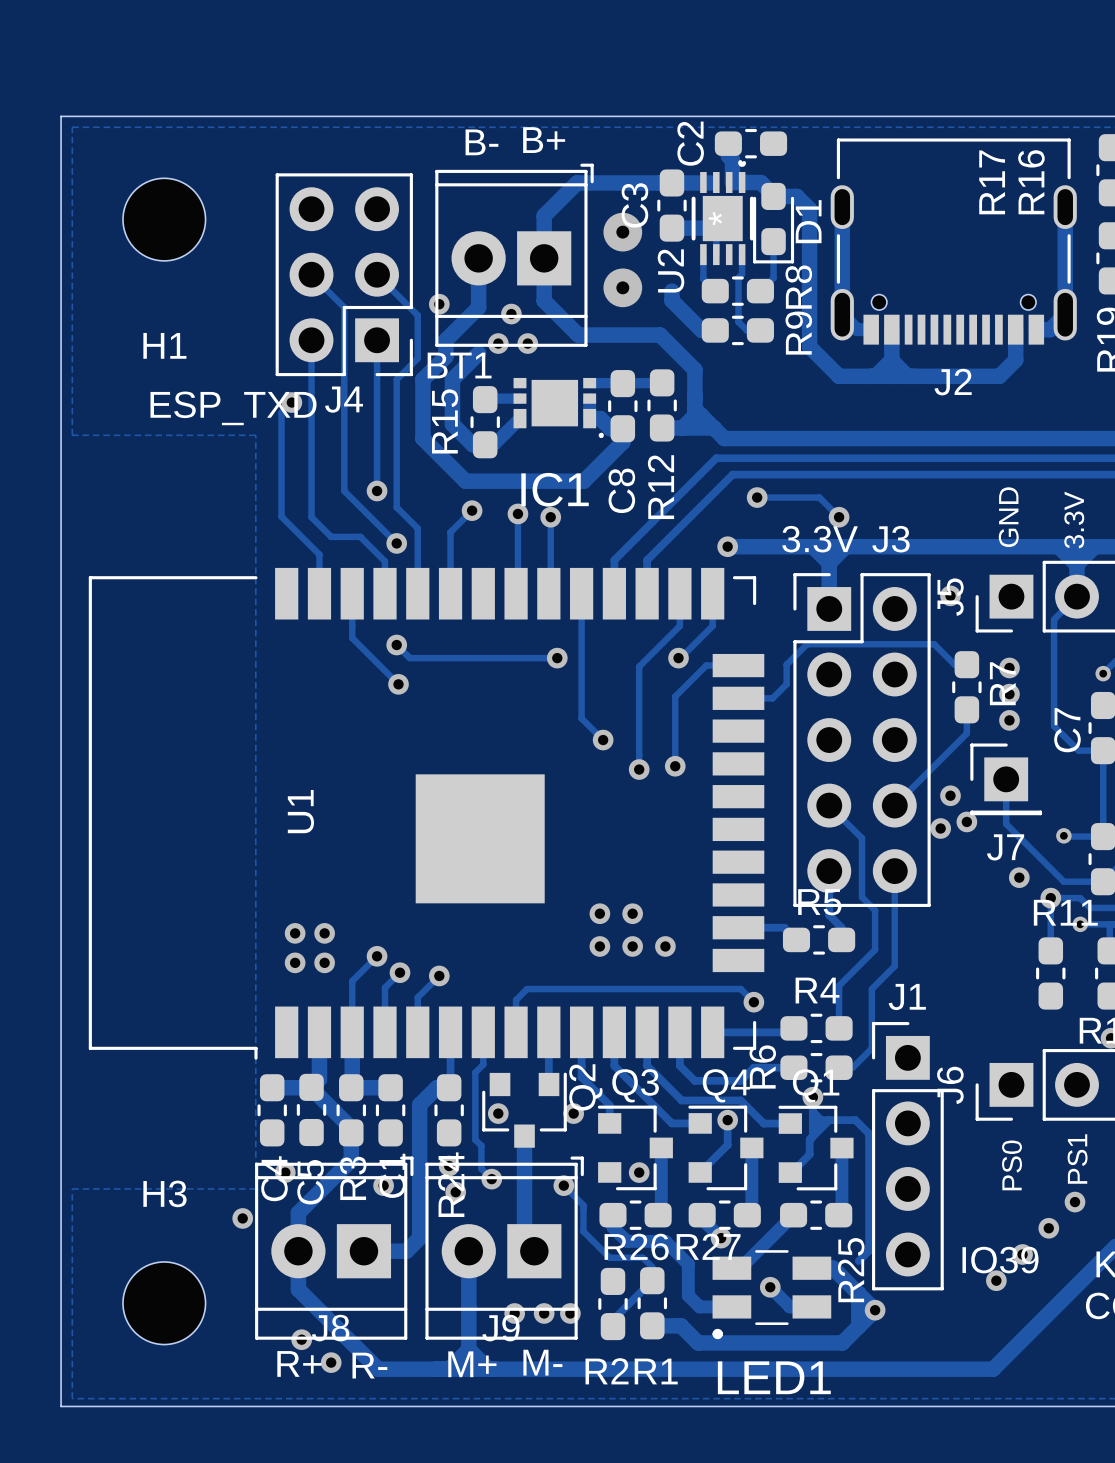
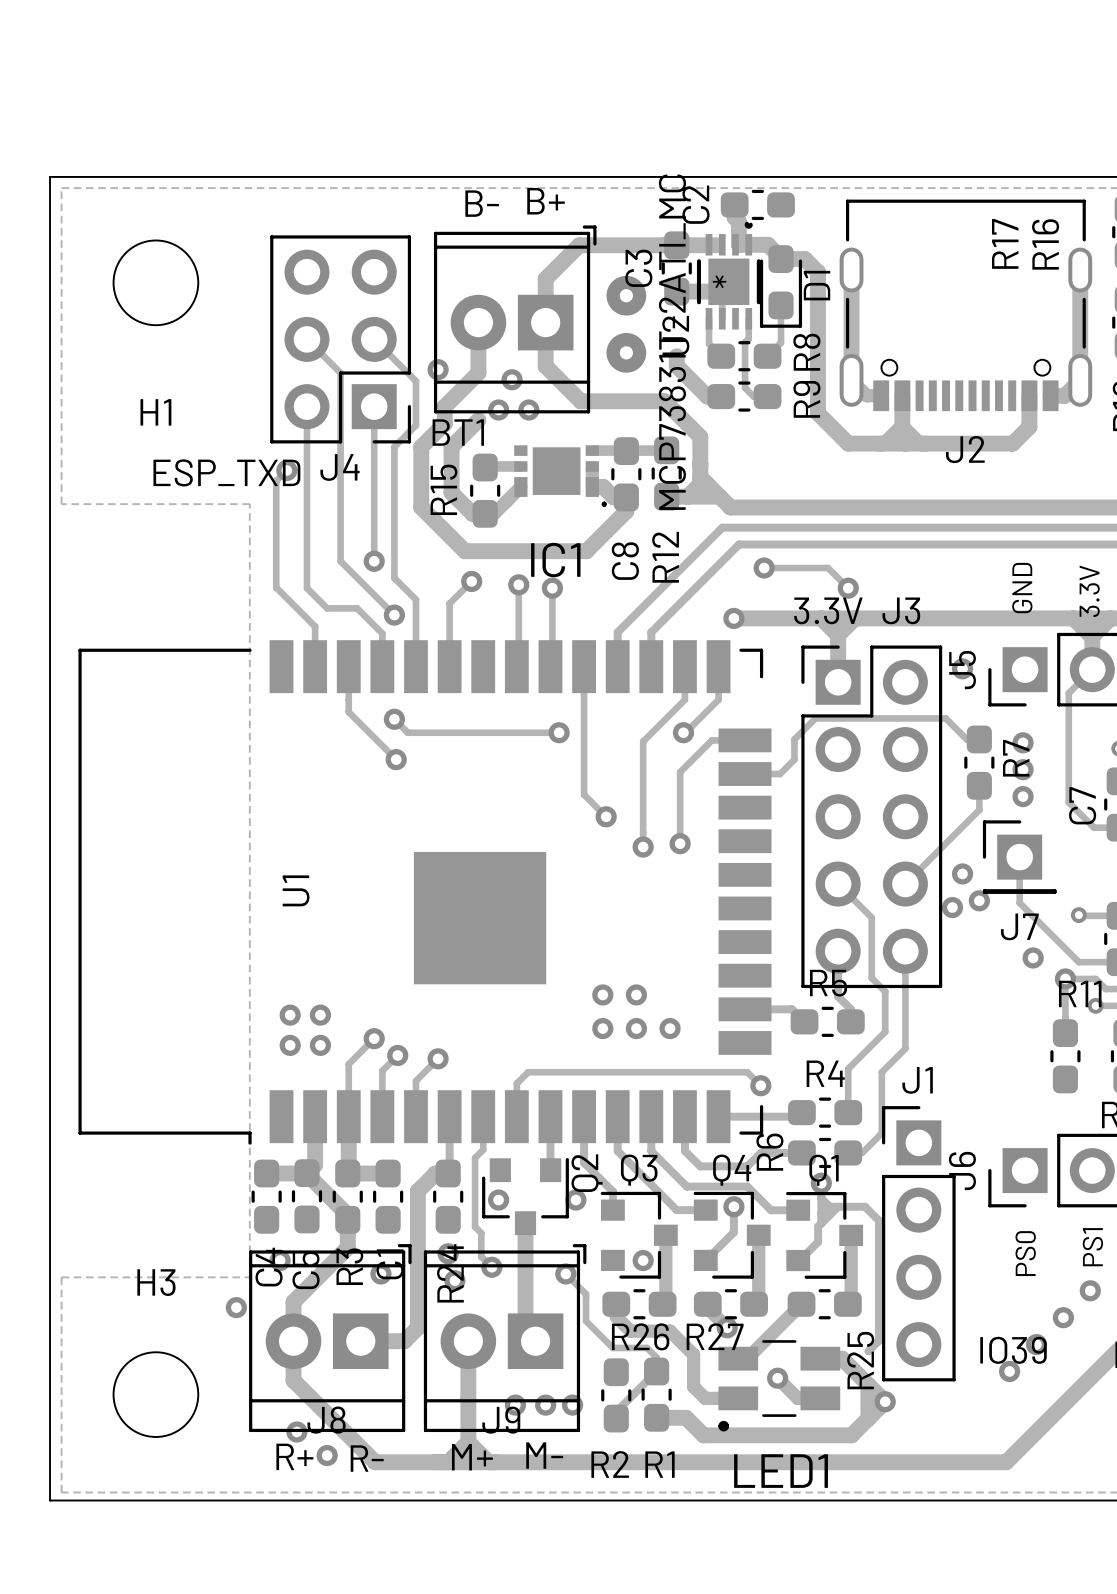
U2 value: none -> MCP73831T-2ATI_MC (672, 342)

